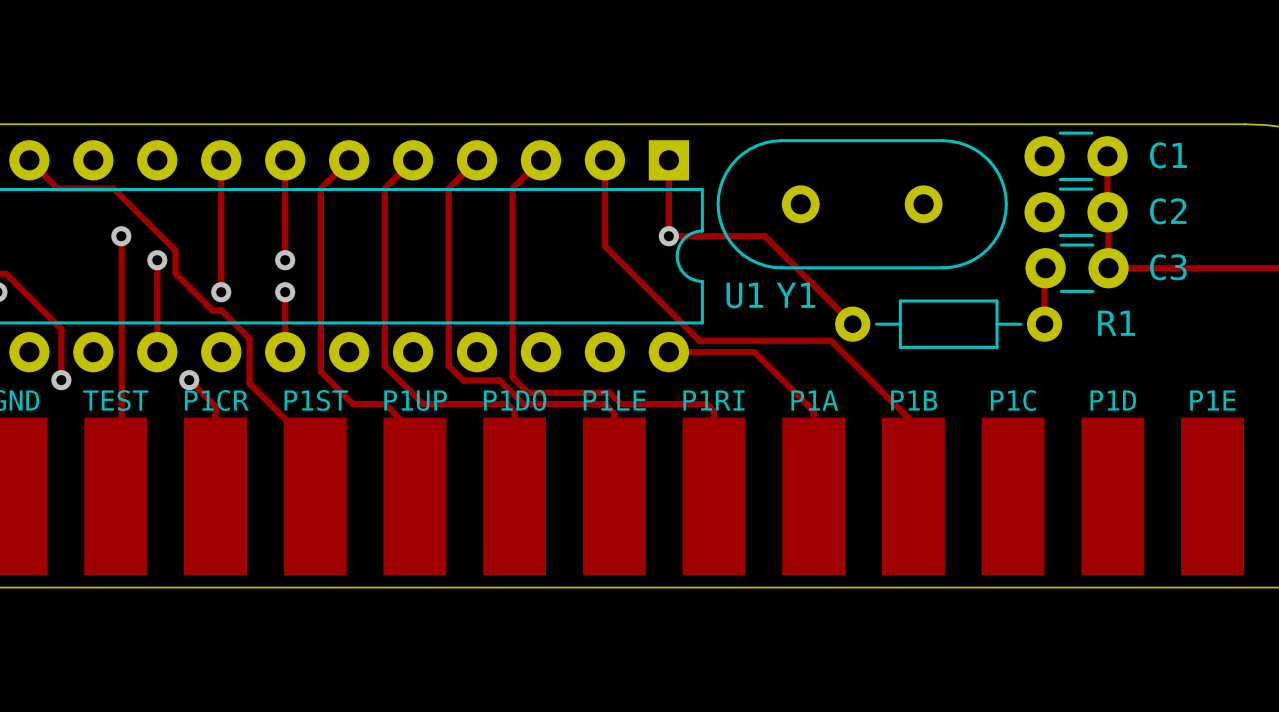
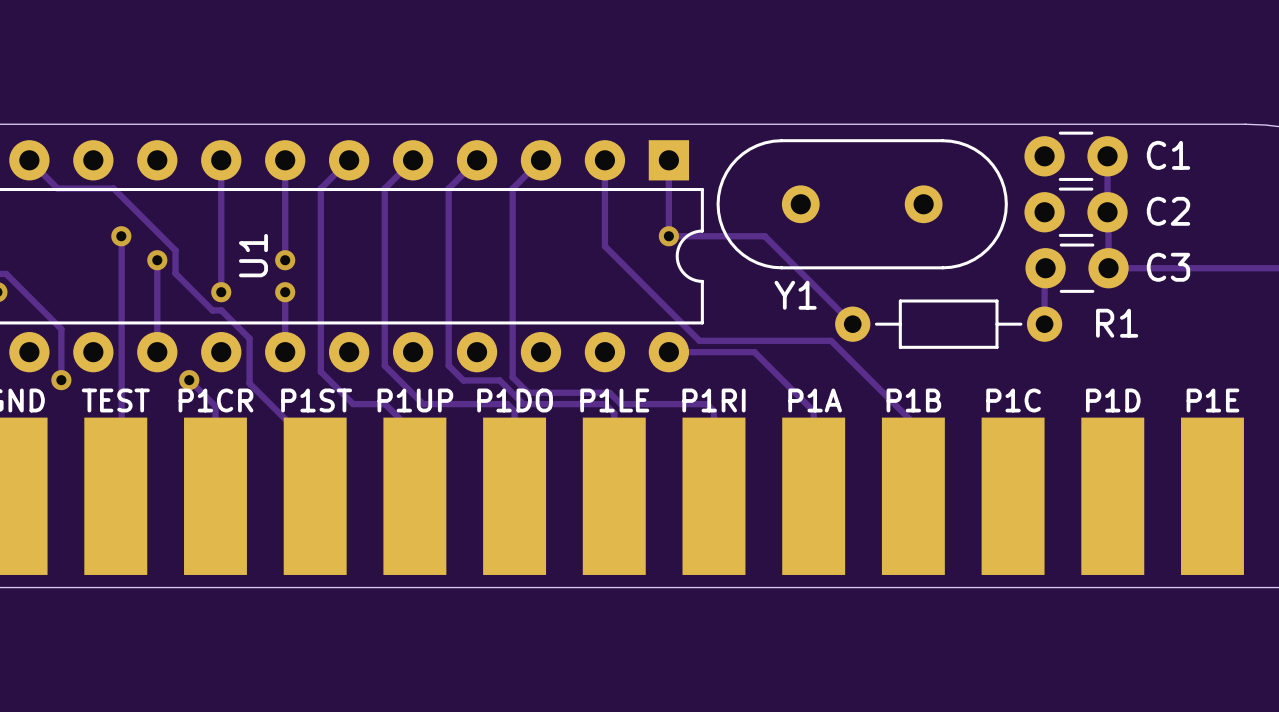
U1 name rotation: 0° (744, 295) -> 90° counterclockwise (253, 255)
U1 name position: U1 (744, 295) -> U1 (253, 255)

